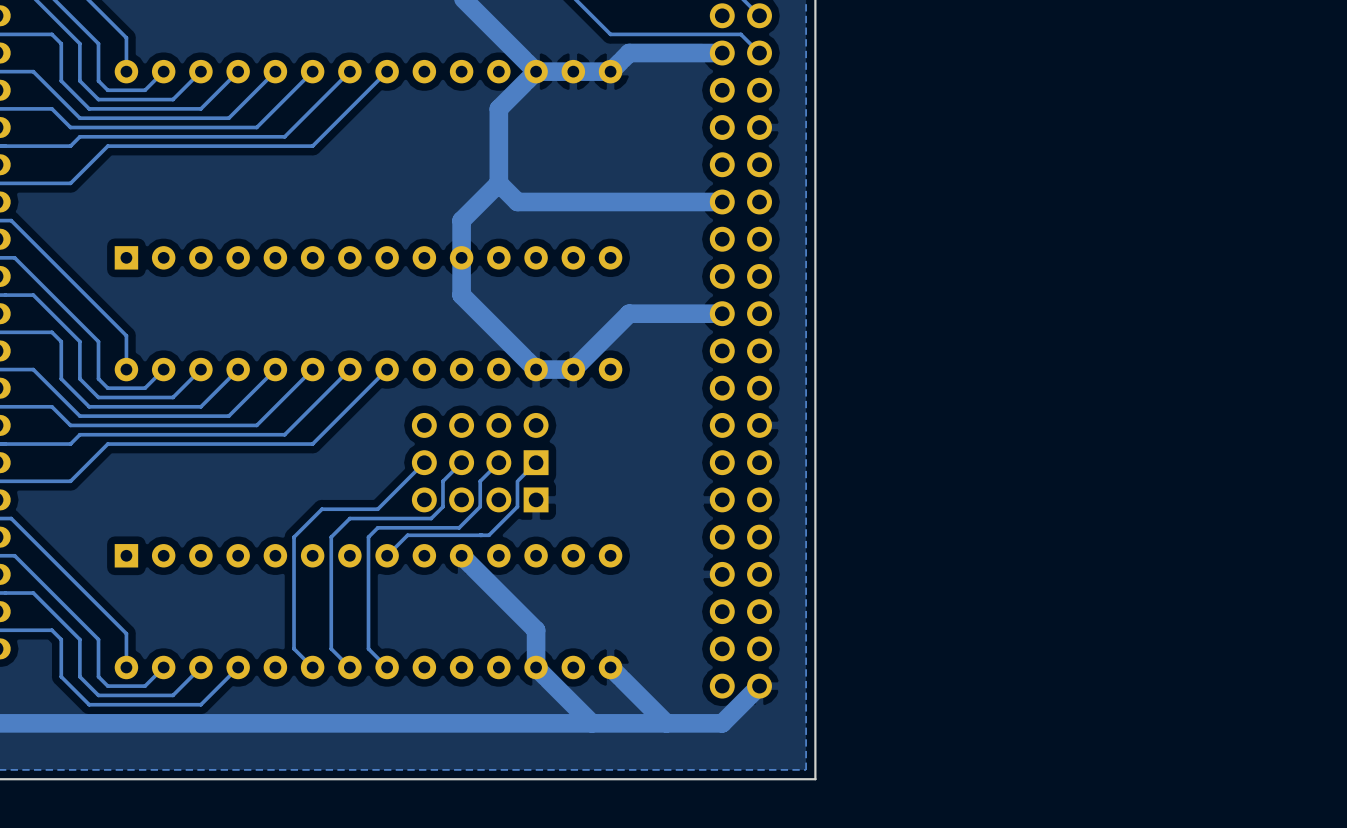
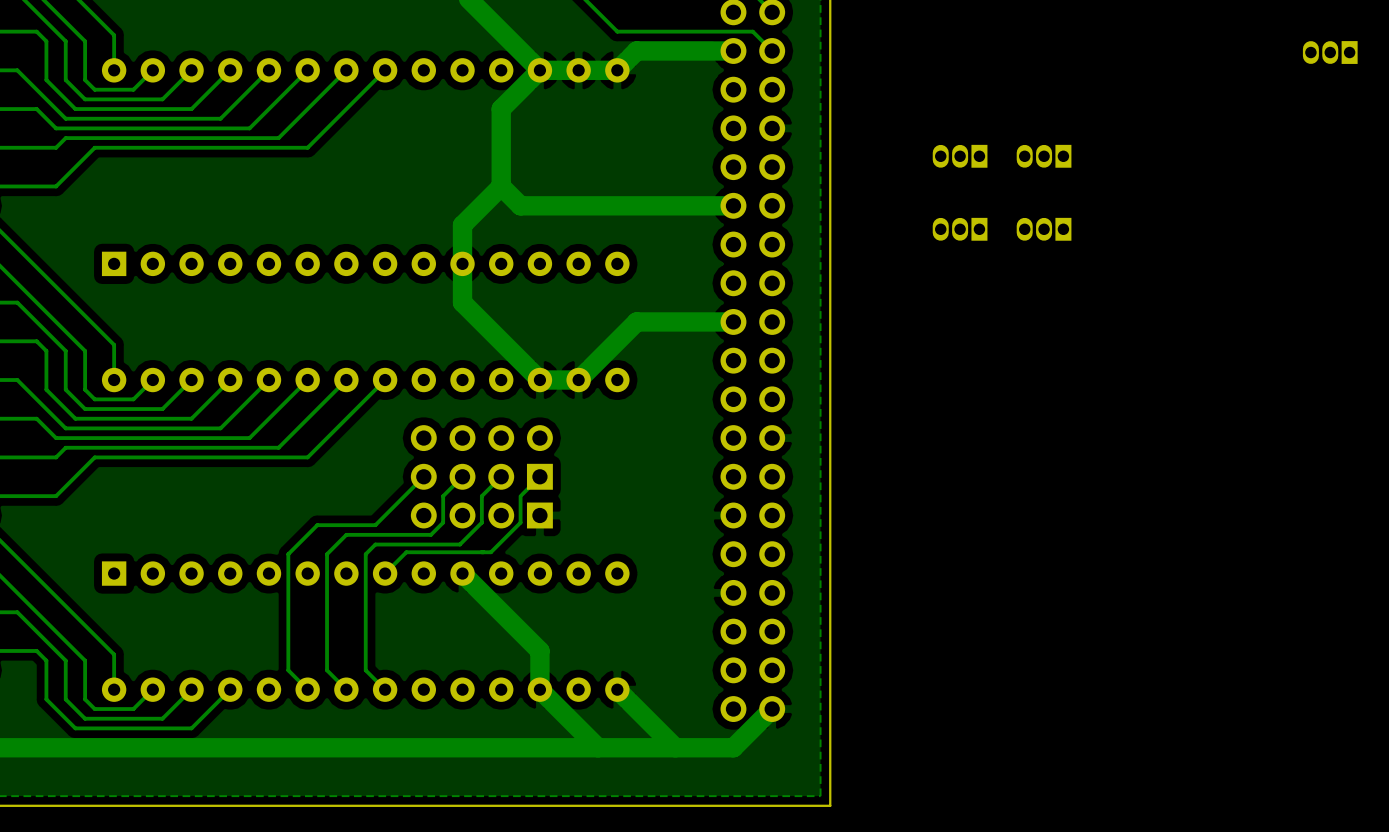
part: none -> (1330, 52)
part: none -> (960, 156)
part: none -> (1044, 156)
part: none -> (960, 229)
part: none -> (1044, 229)

